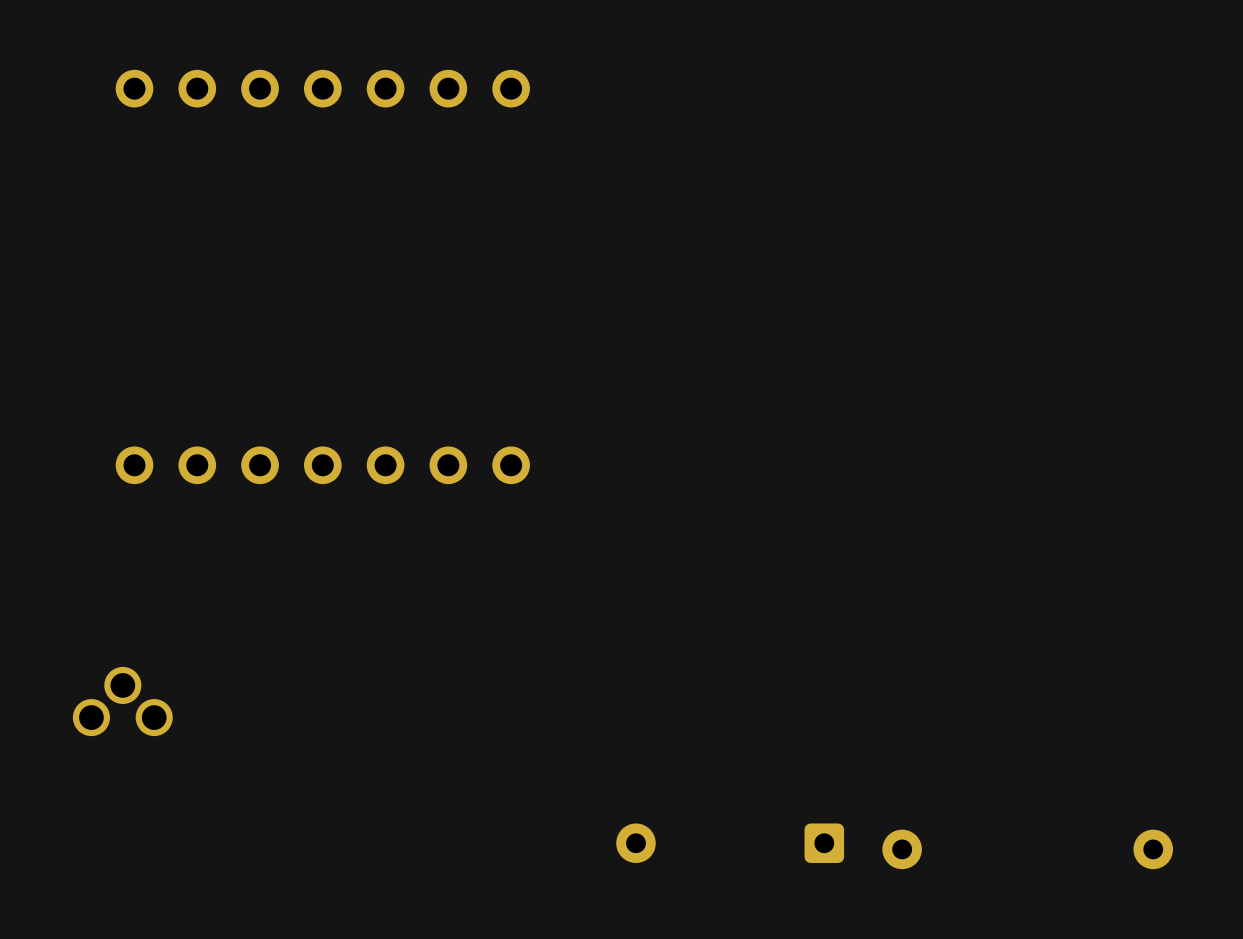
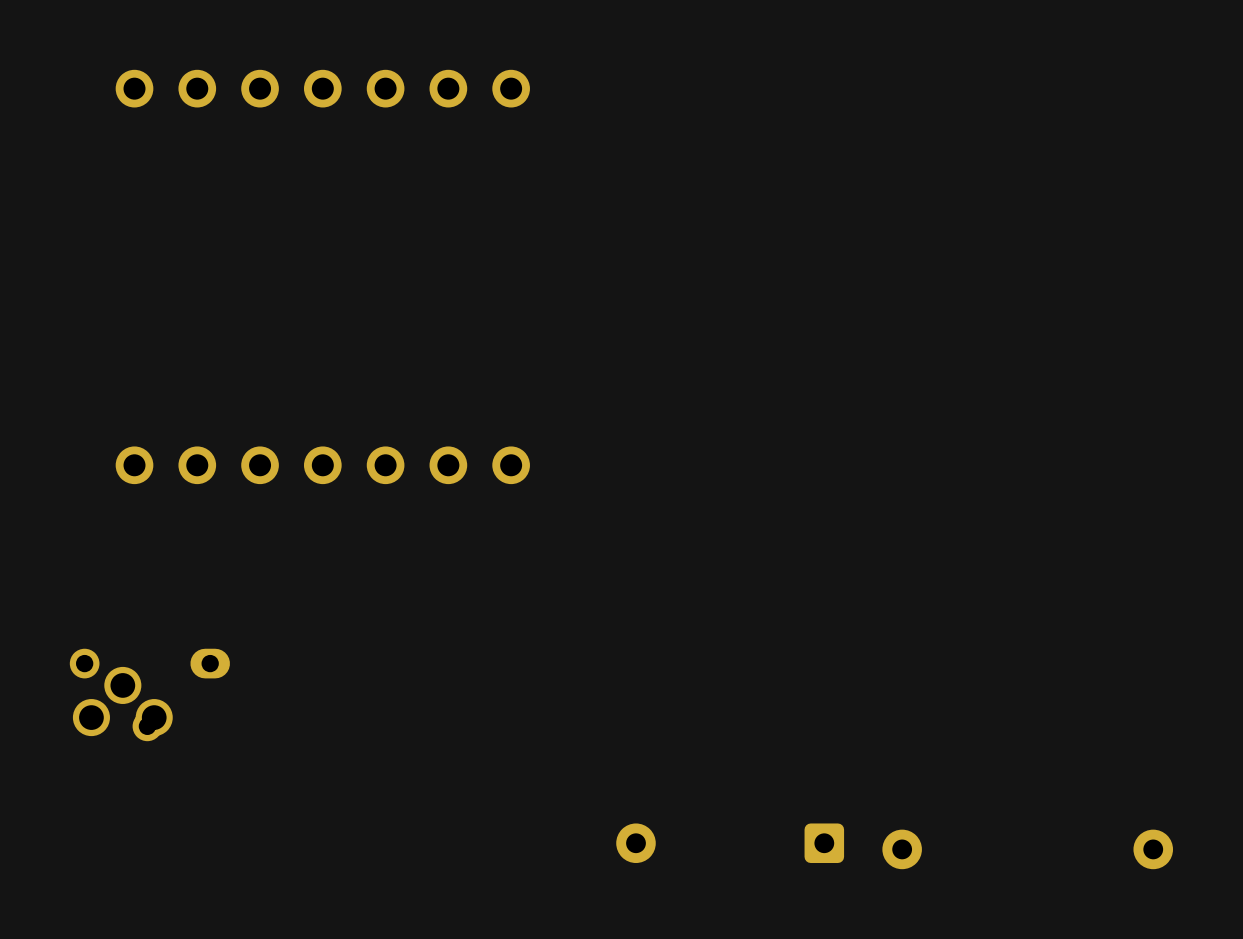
part: none -> (149, 694)

